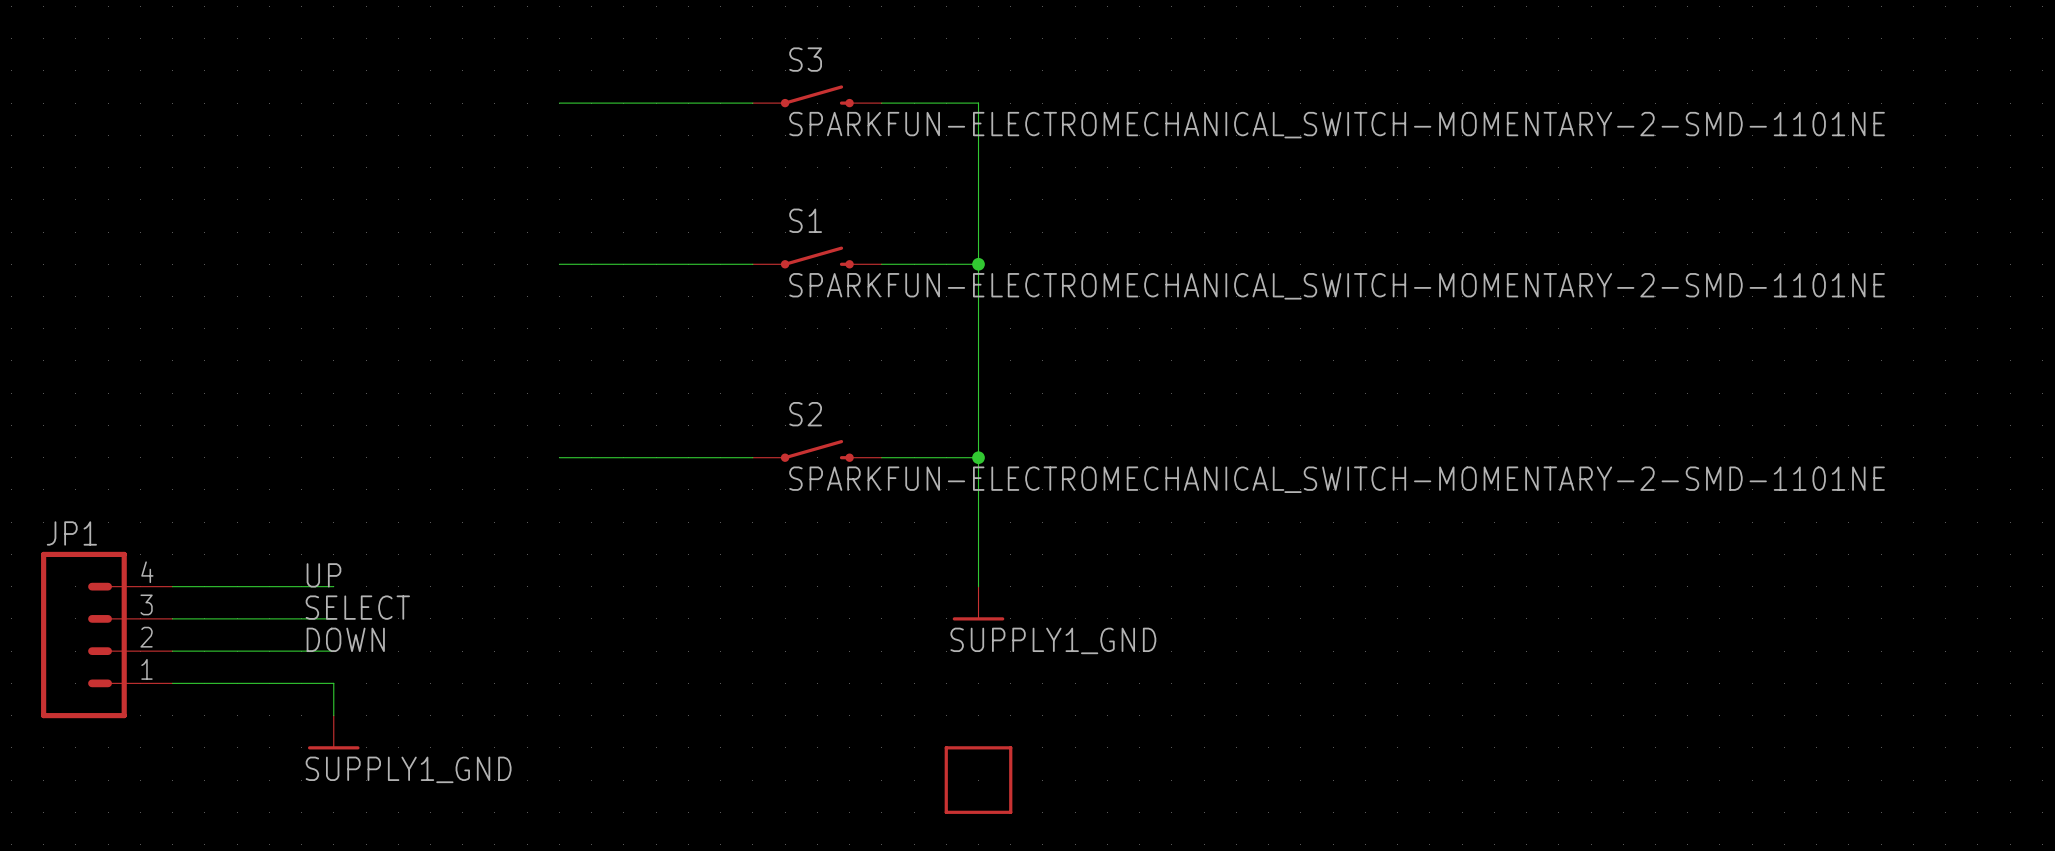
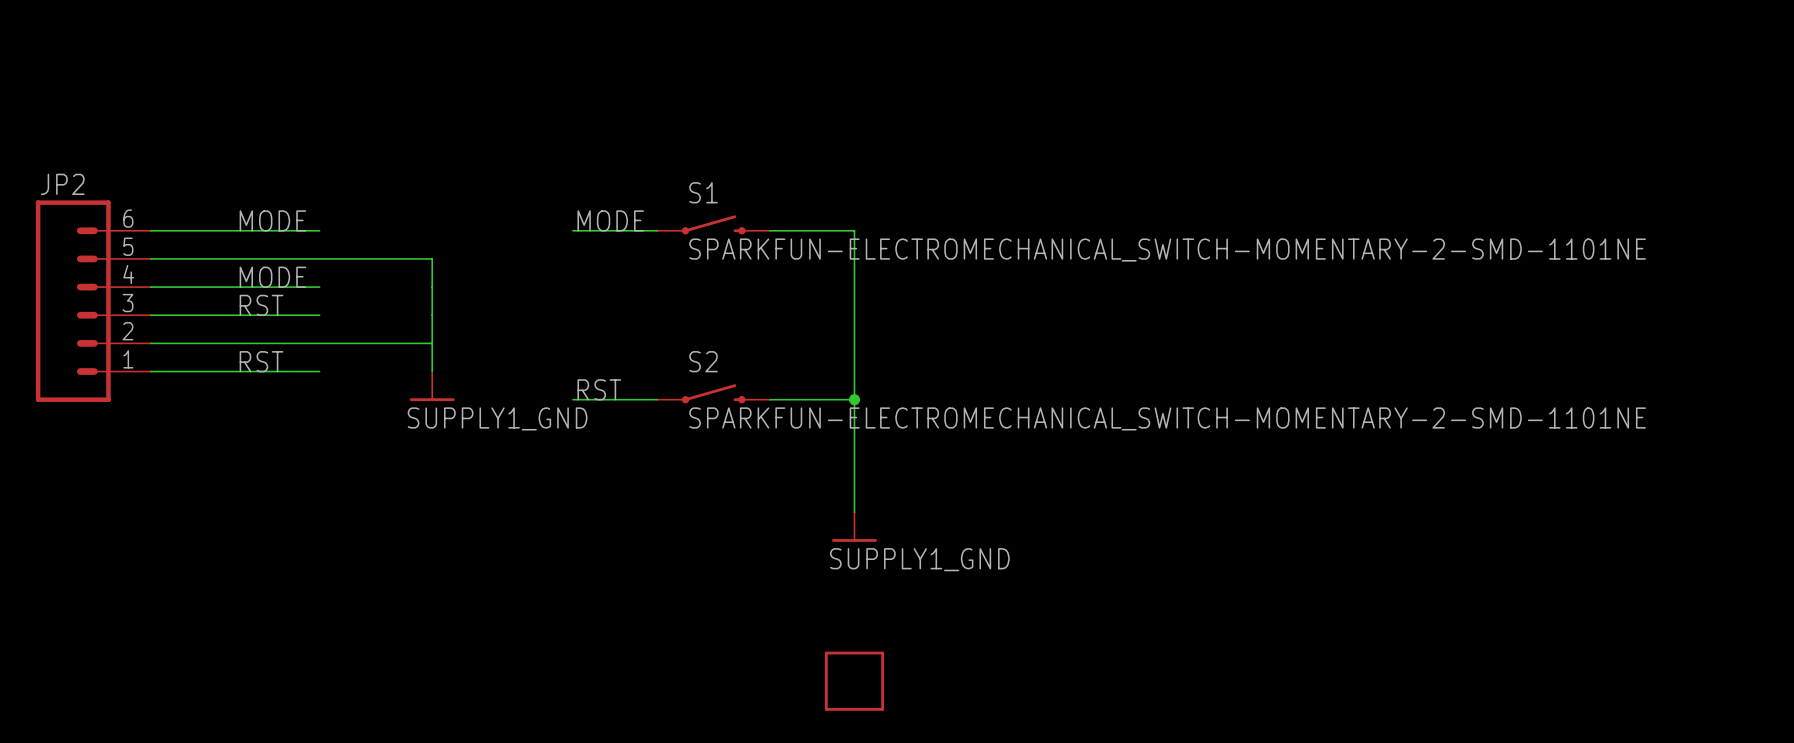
S3: SPARKFUN-ELECTROMECHANICAL_SWITCH-MOMENTARY-2-SMD-1101NE (817, 96) -> none
wire: (559, 103) (752, 103) -> none
wire: (881, 103) (978, 103) (978, 264) -> none
label: none -> MODE (272, 220)
label: none -> MODE (610, 220)
wire: none -> (150, 230) (319, 230)
wire: (559, 264) (656, 264) -> none
junction: (978, 264) -> none
wire: none -> (150, 258) (432, 258) (432, 371)
label: none -> MODE (272, 277)
wire: none -> (150, 287) (319, 287)
JP2: none -> (93, 301)
label: none -> RST (261, 305)
wire: none -> (150, 315) (319, 315)
wire: none -> (150, 343) (432, 343)
label: none -> RST (261, 361)
wire: none -> (150, 371) (319, 371)
power symbol: none -> SUPPLY1_GND (432, 386)
label: none -> RST (599, 389)
wire: (559, 457) (656, 457) -> none
label: UP (323, 575) -> none
wire: (172, 586) (333, 586) -> none
label: SELECT (357, 607) -> none
wire: (172, 618) (333, 618) -> none
JP1: (106, 635) -> none
label: DOWN (345, 639) -> none
wire: (172, 651) (333, 651) -> none
wire: (172, 683) (333, 683) (333, 715) -> none
power symbol: SUPPLY1_GND (333, 732) -> none

